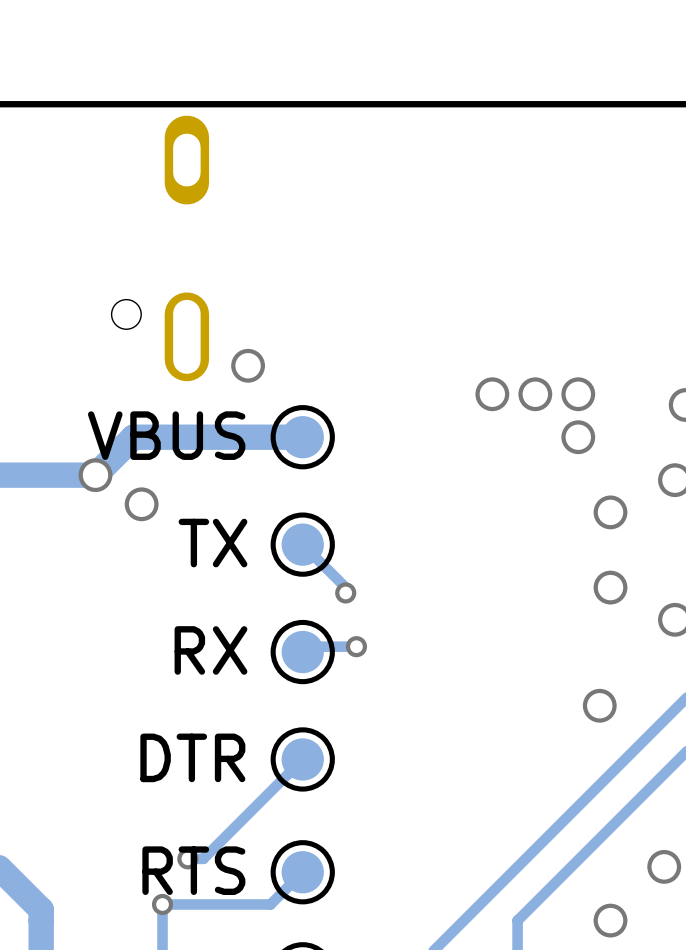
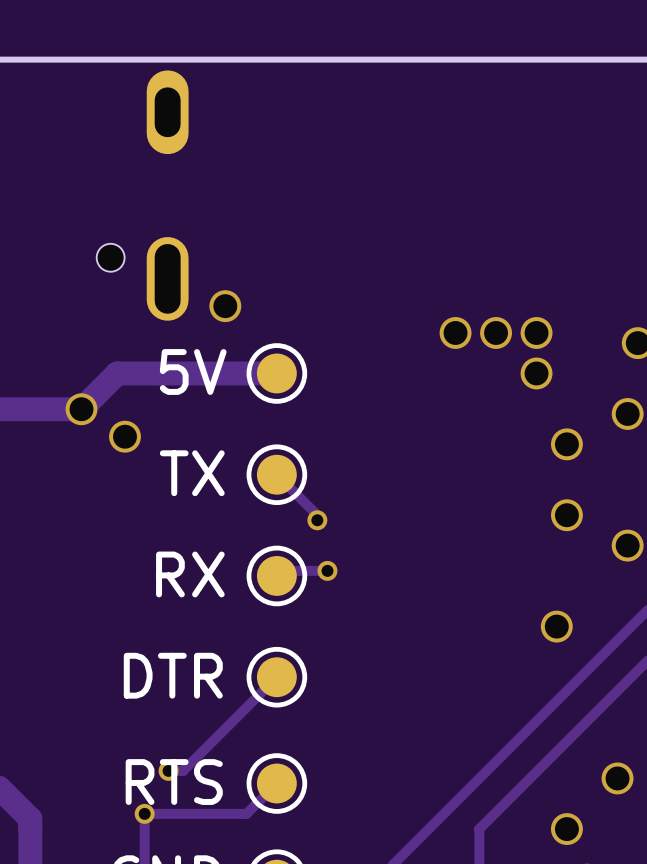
part value: VBUS (166, 435) -> 5V (193, 371)

